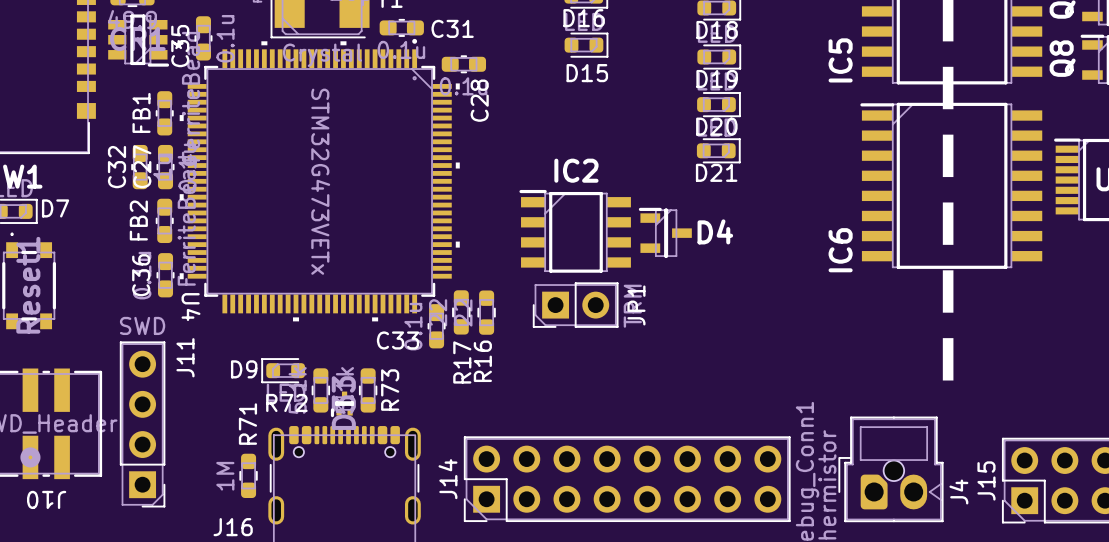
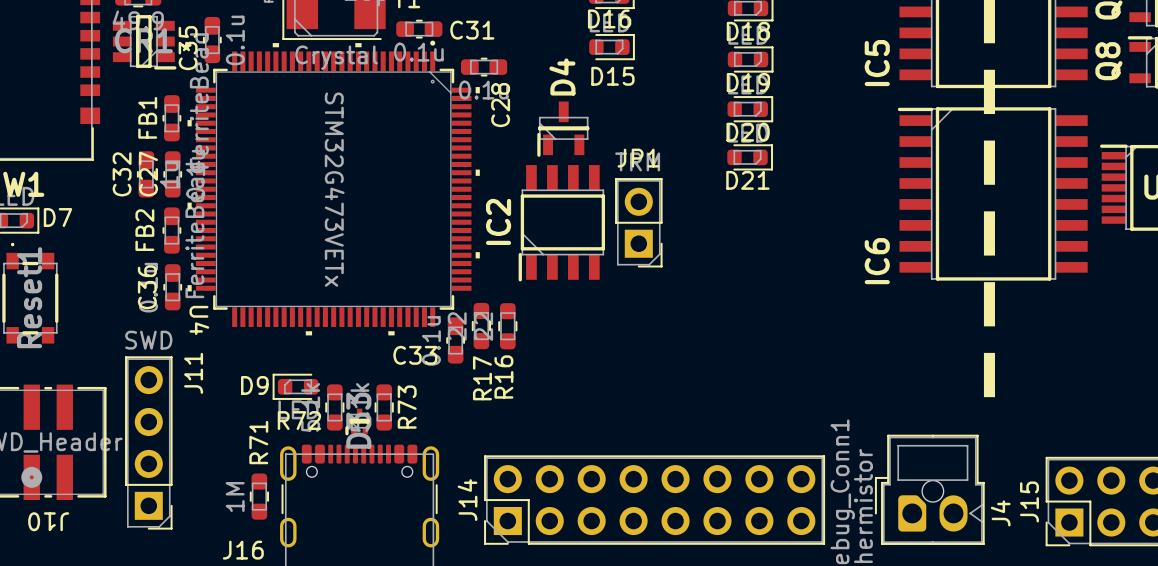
IC2 rotation: 0° (575, 231) -> 90° counterclockwise (561, 223)
D4 rotation: 0° (665, 232) -> 90° counterclockwise (563, 129)
D4 position: (665, 232) -> (563, 129)
JP1 rotation: 0° (575, 305) -> 90° counterclockwise (638, 222)
JP1 position: (575, 305) -> (638, 222)

